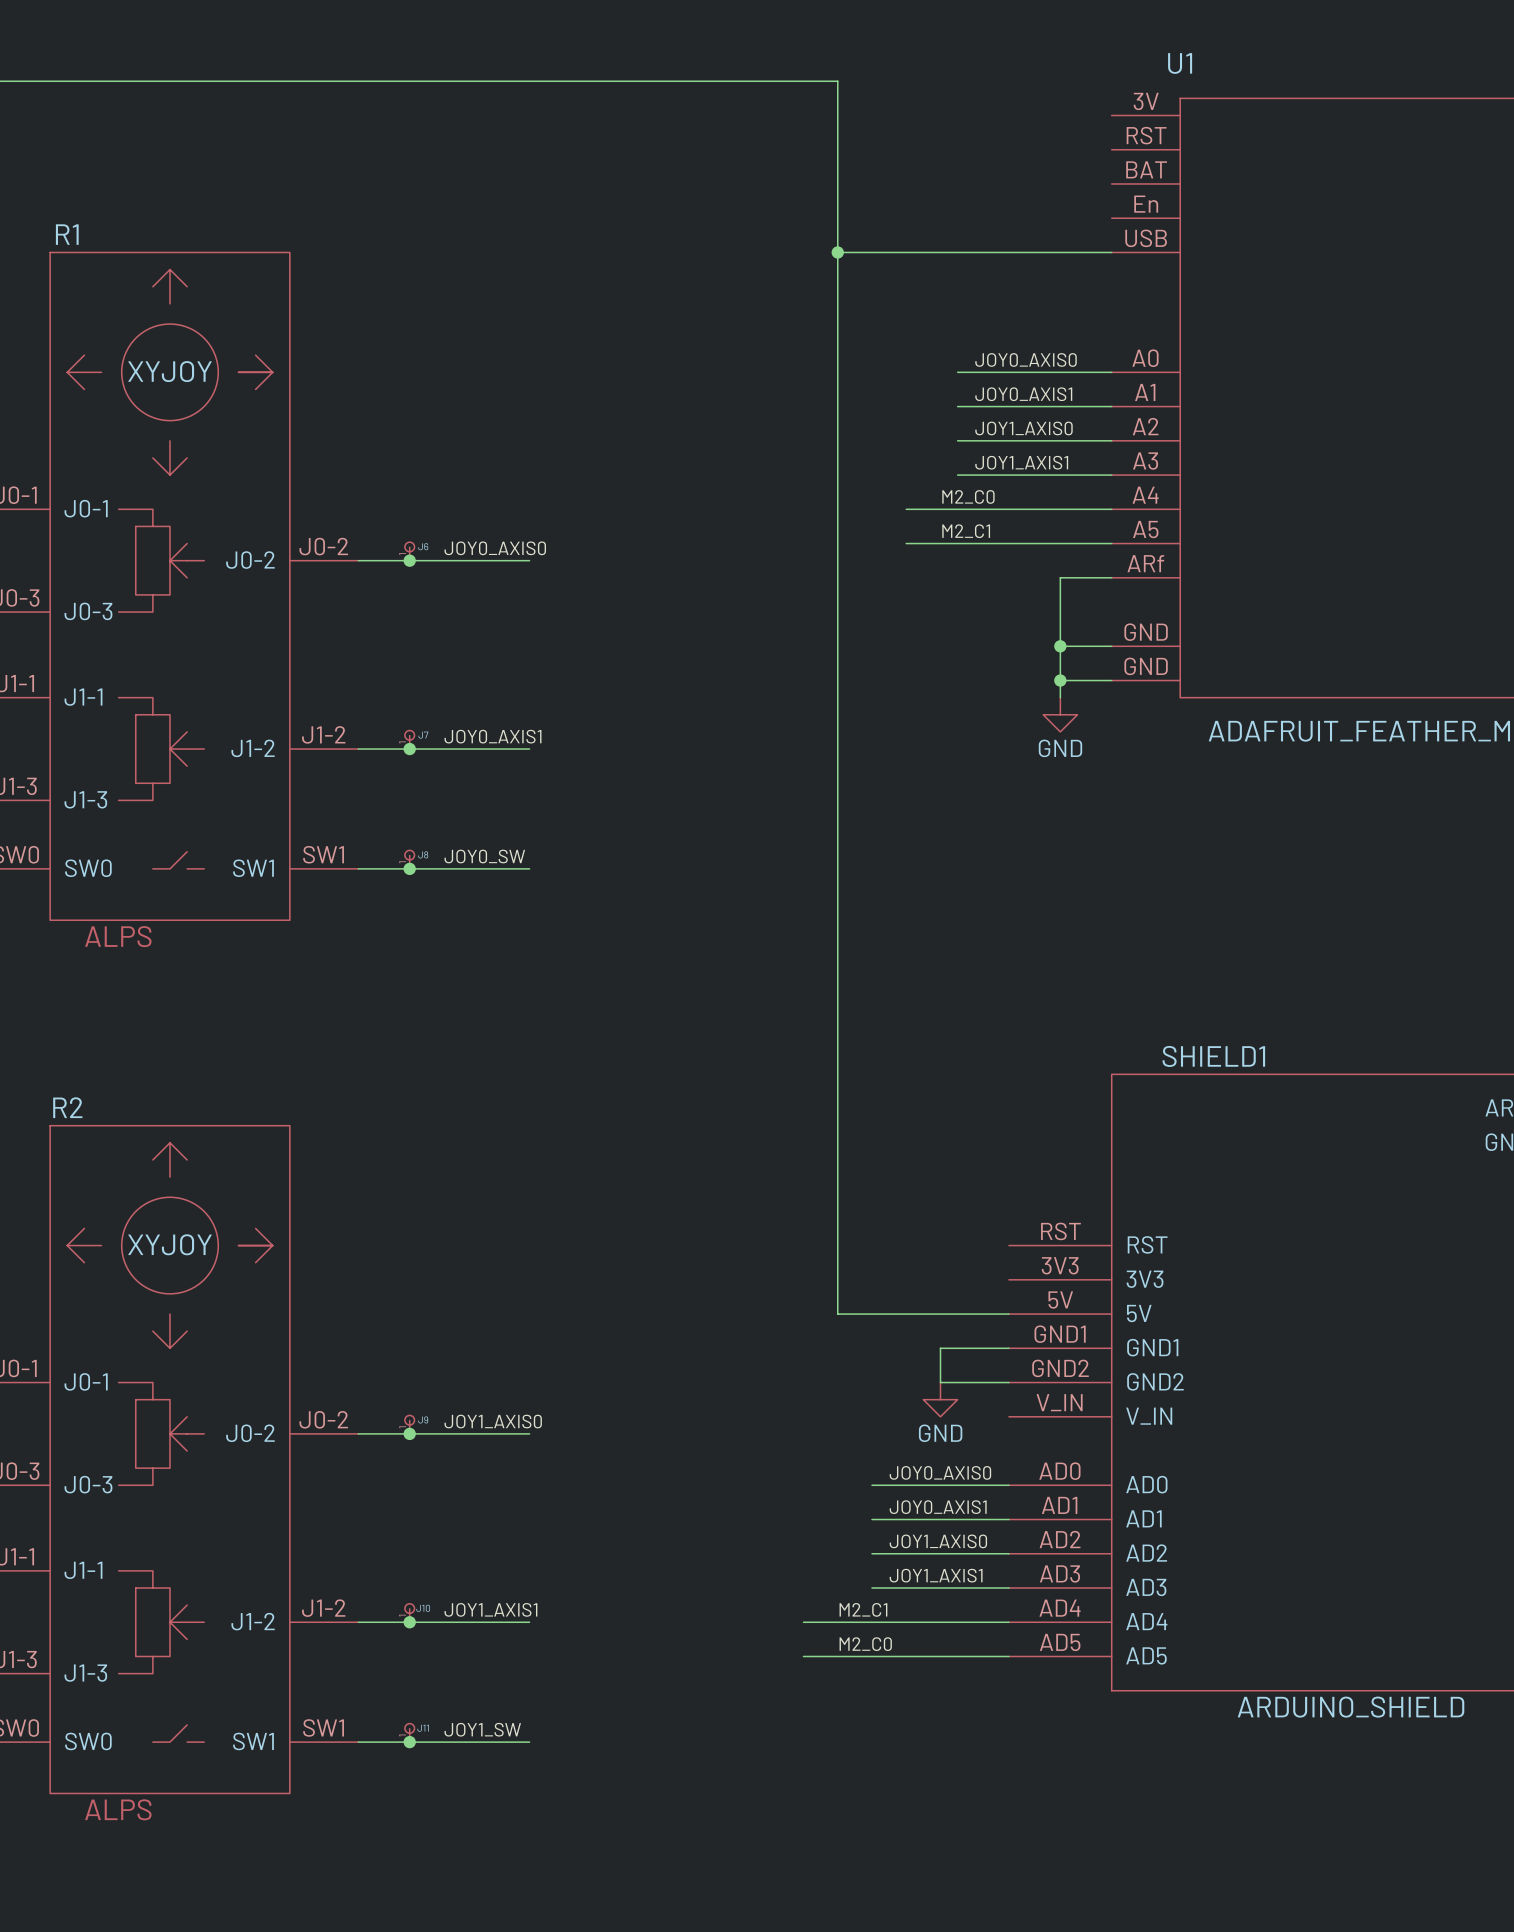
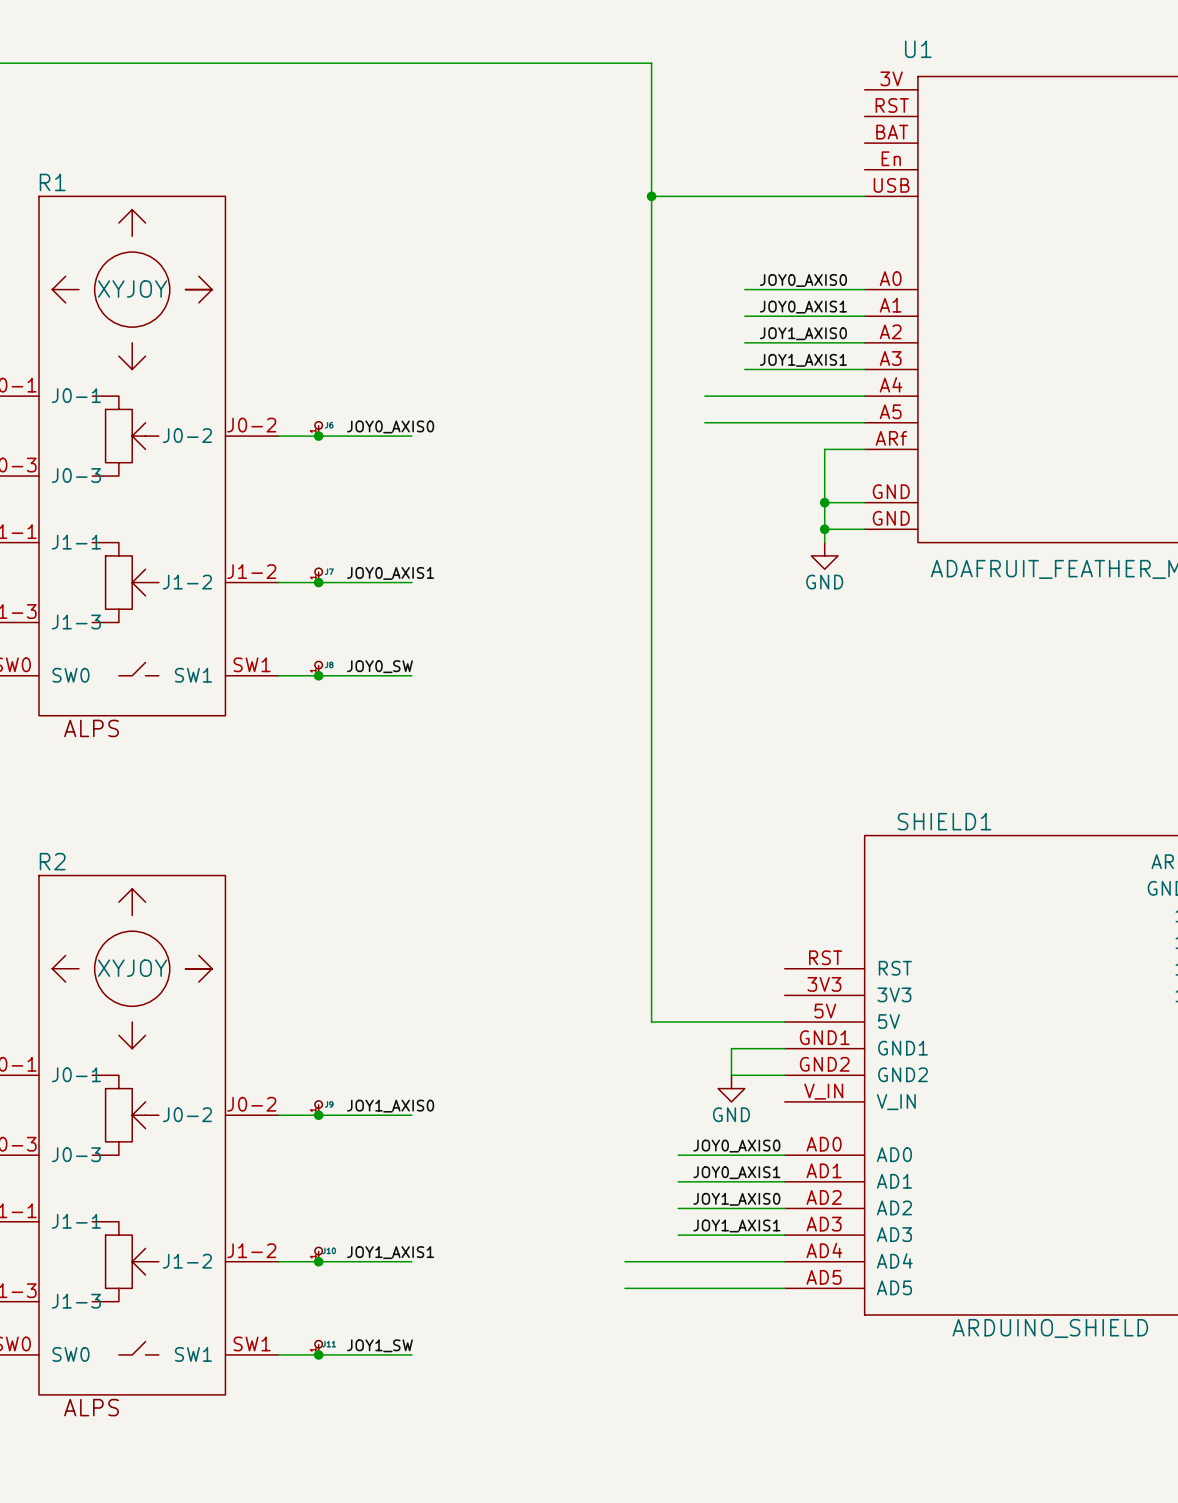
label: M2_C0 (968, 496) -> none
label: M2_C1 (966, 531) -> none
label: M2_C1 (863, 1609) -> none
label: M2_C0 (865, 1644) -> none

